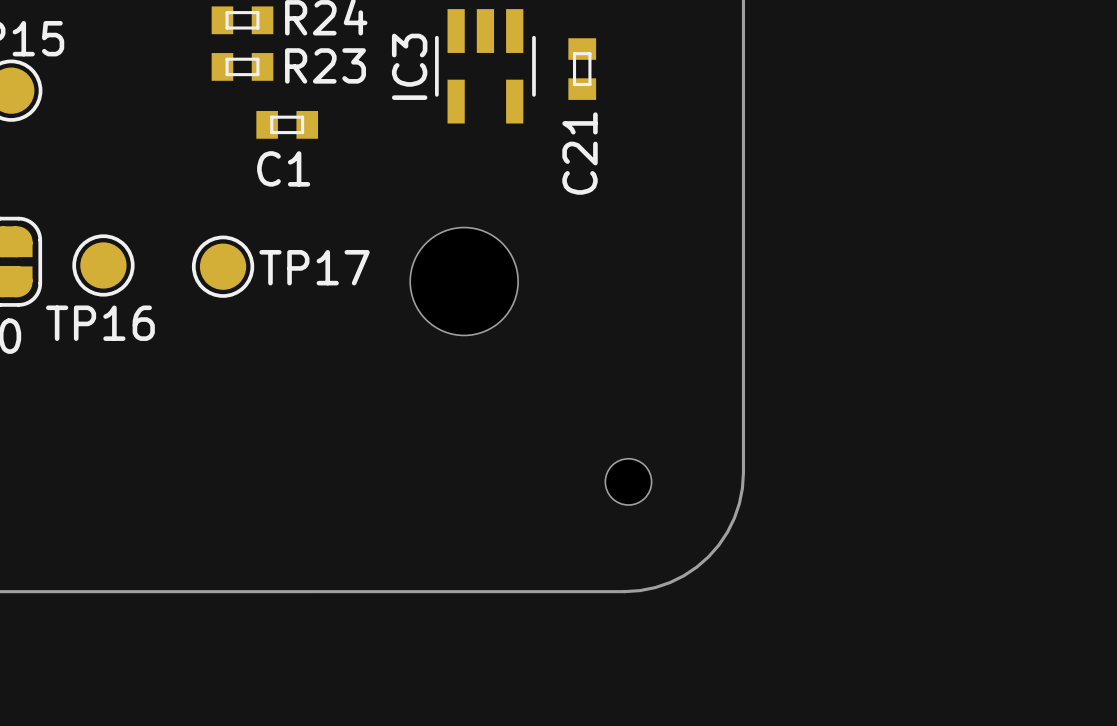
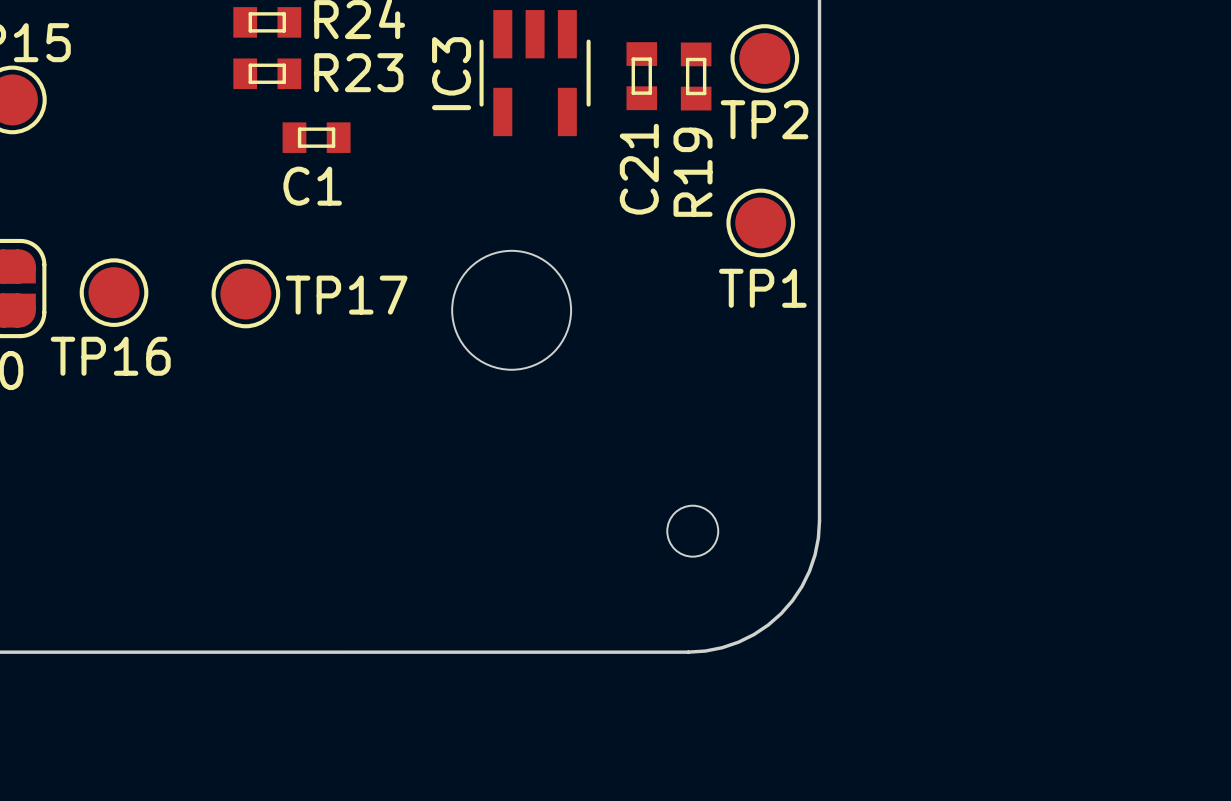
TP2: none -> (764, 58)
R19: none -> (696, 76)
TP1: none -> (760, 222)

